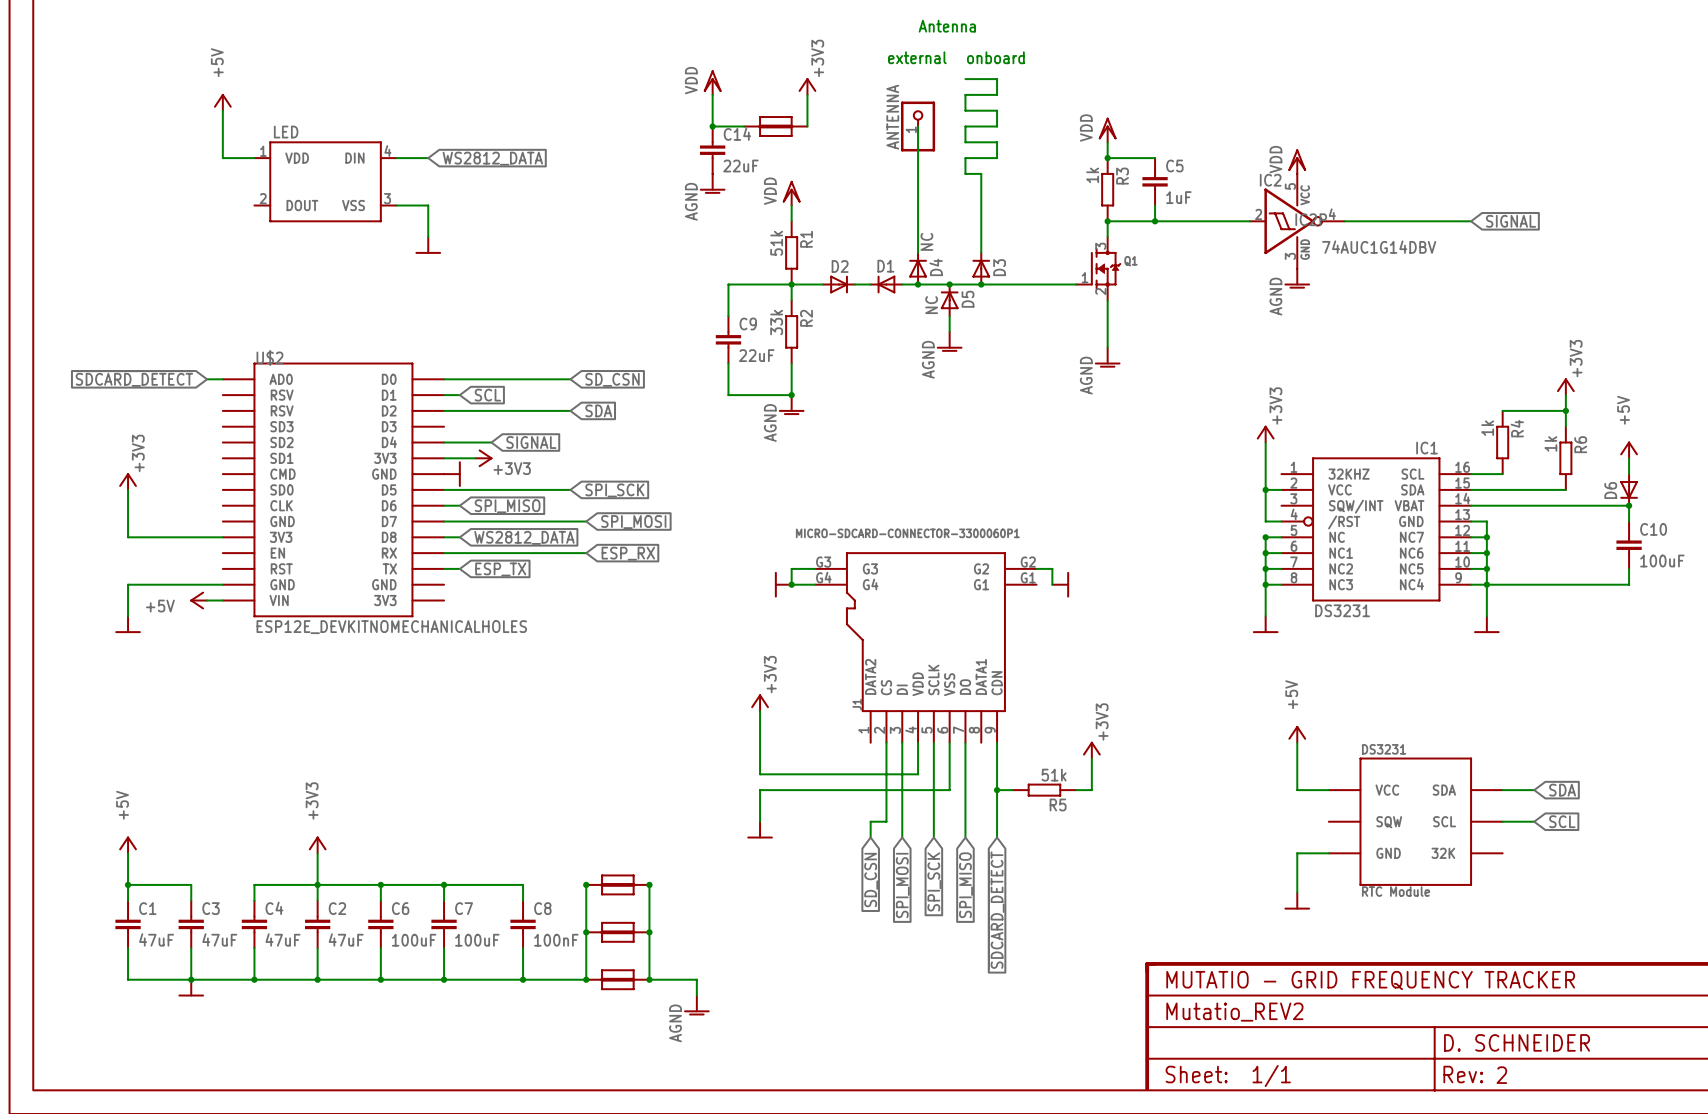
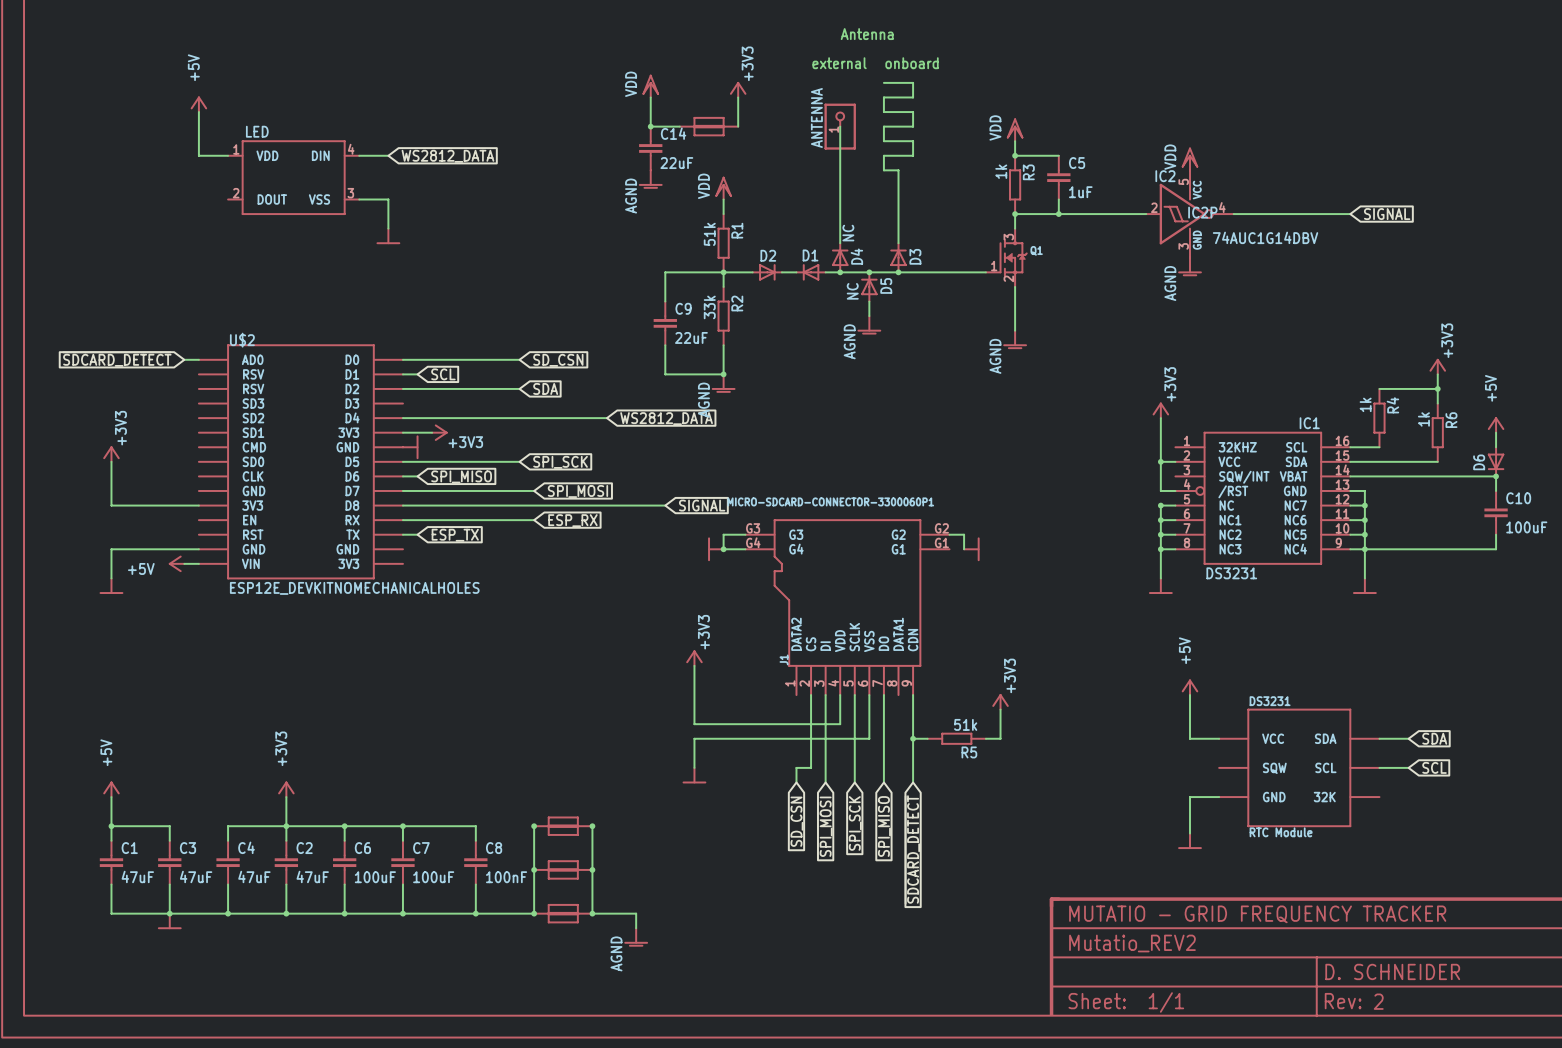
wire: none -> (446, 418) (607, 418)
global label: SIGNAL (531, 442) -> none
global label: none -> WS2812_DATA (666, 418)
wire: none -> (417, 505) (665, 505)
global label: WS2812_DATA (524, 537) -> none
global label: none -> SIGNAL (702, 505)

